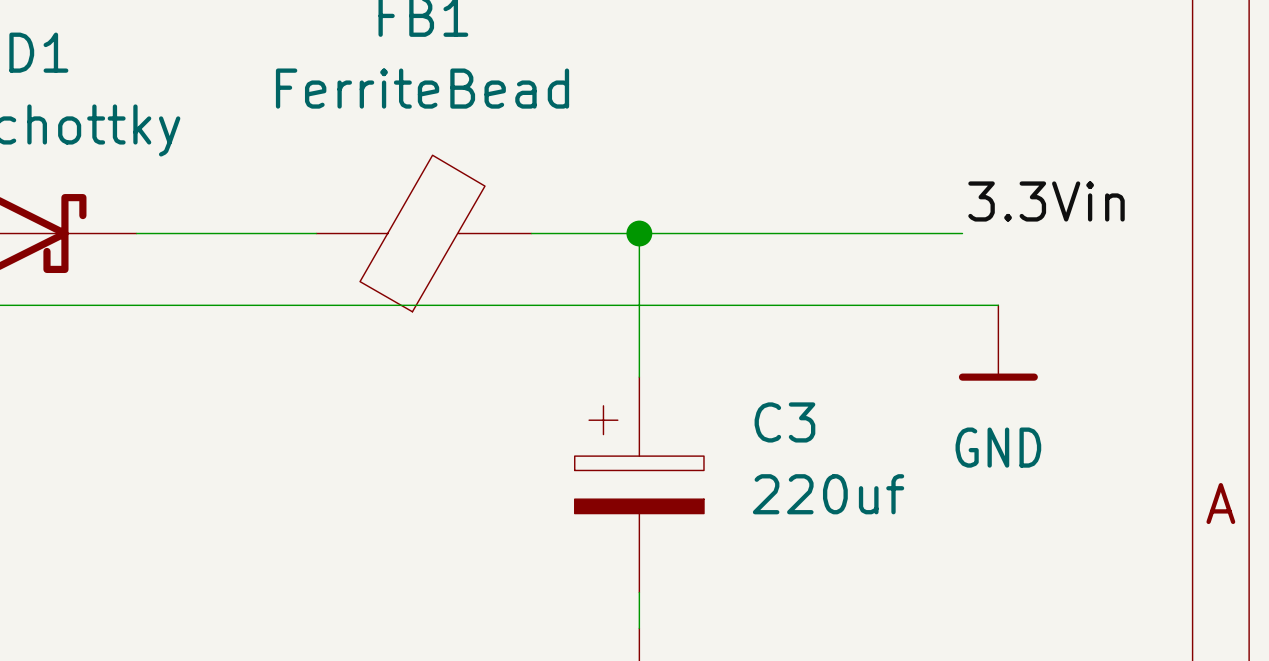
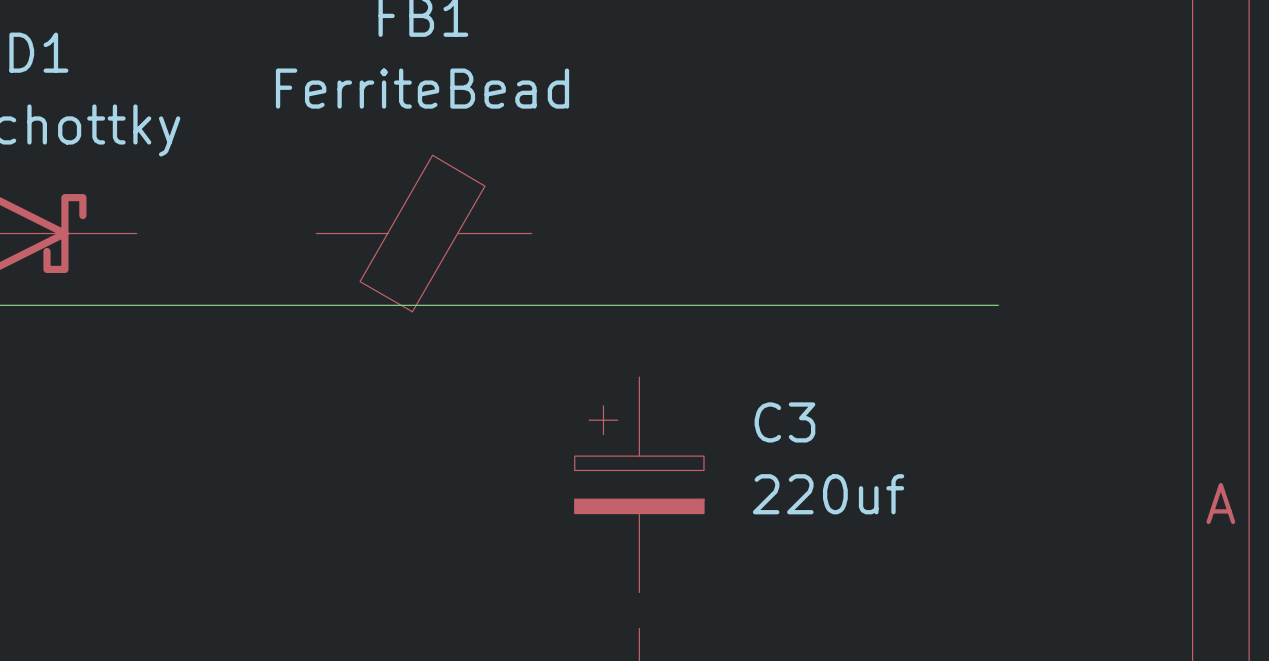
label: 3.3Vin (1046, 201) -> none
wire: (136, 233) (316, 233) -> none
wire: (531, 233) (962, 233) -> none
wire: (639, 233) (639, 377) -> none
junction: (639, 233) -> none
power symbol: GND (998, 343) -> none
wire: (639, 592) (639, 628) -> none

